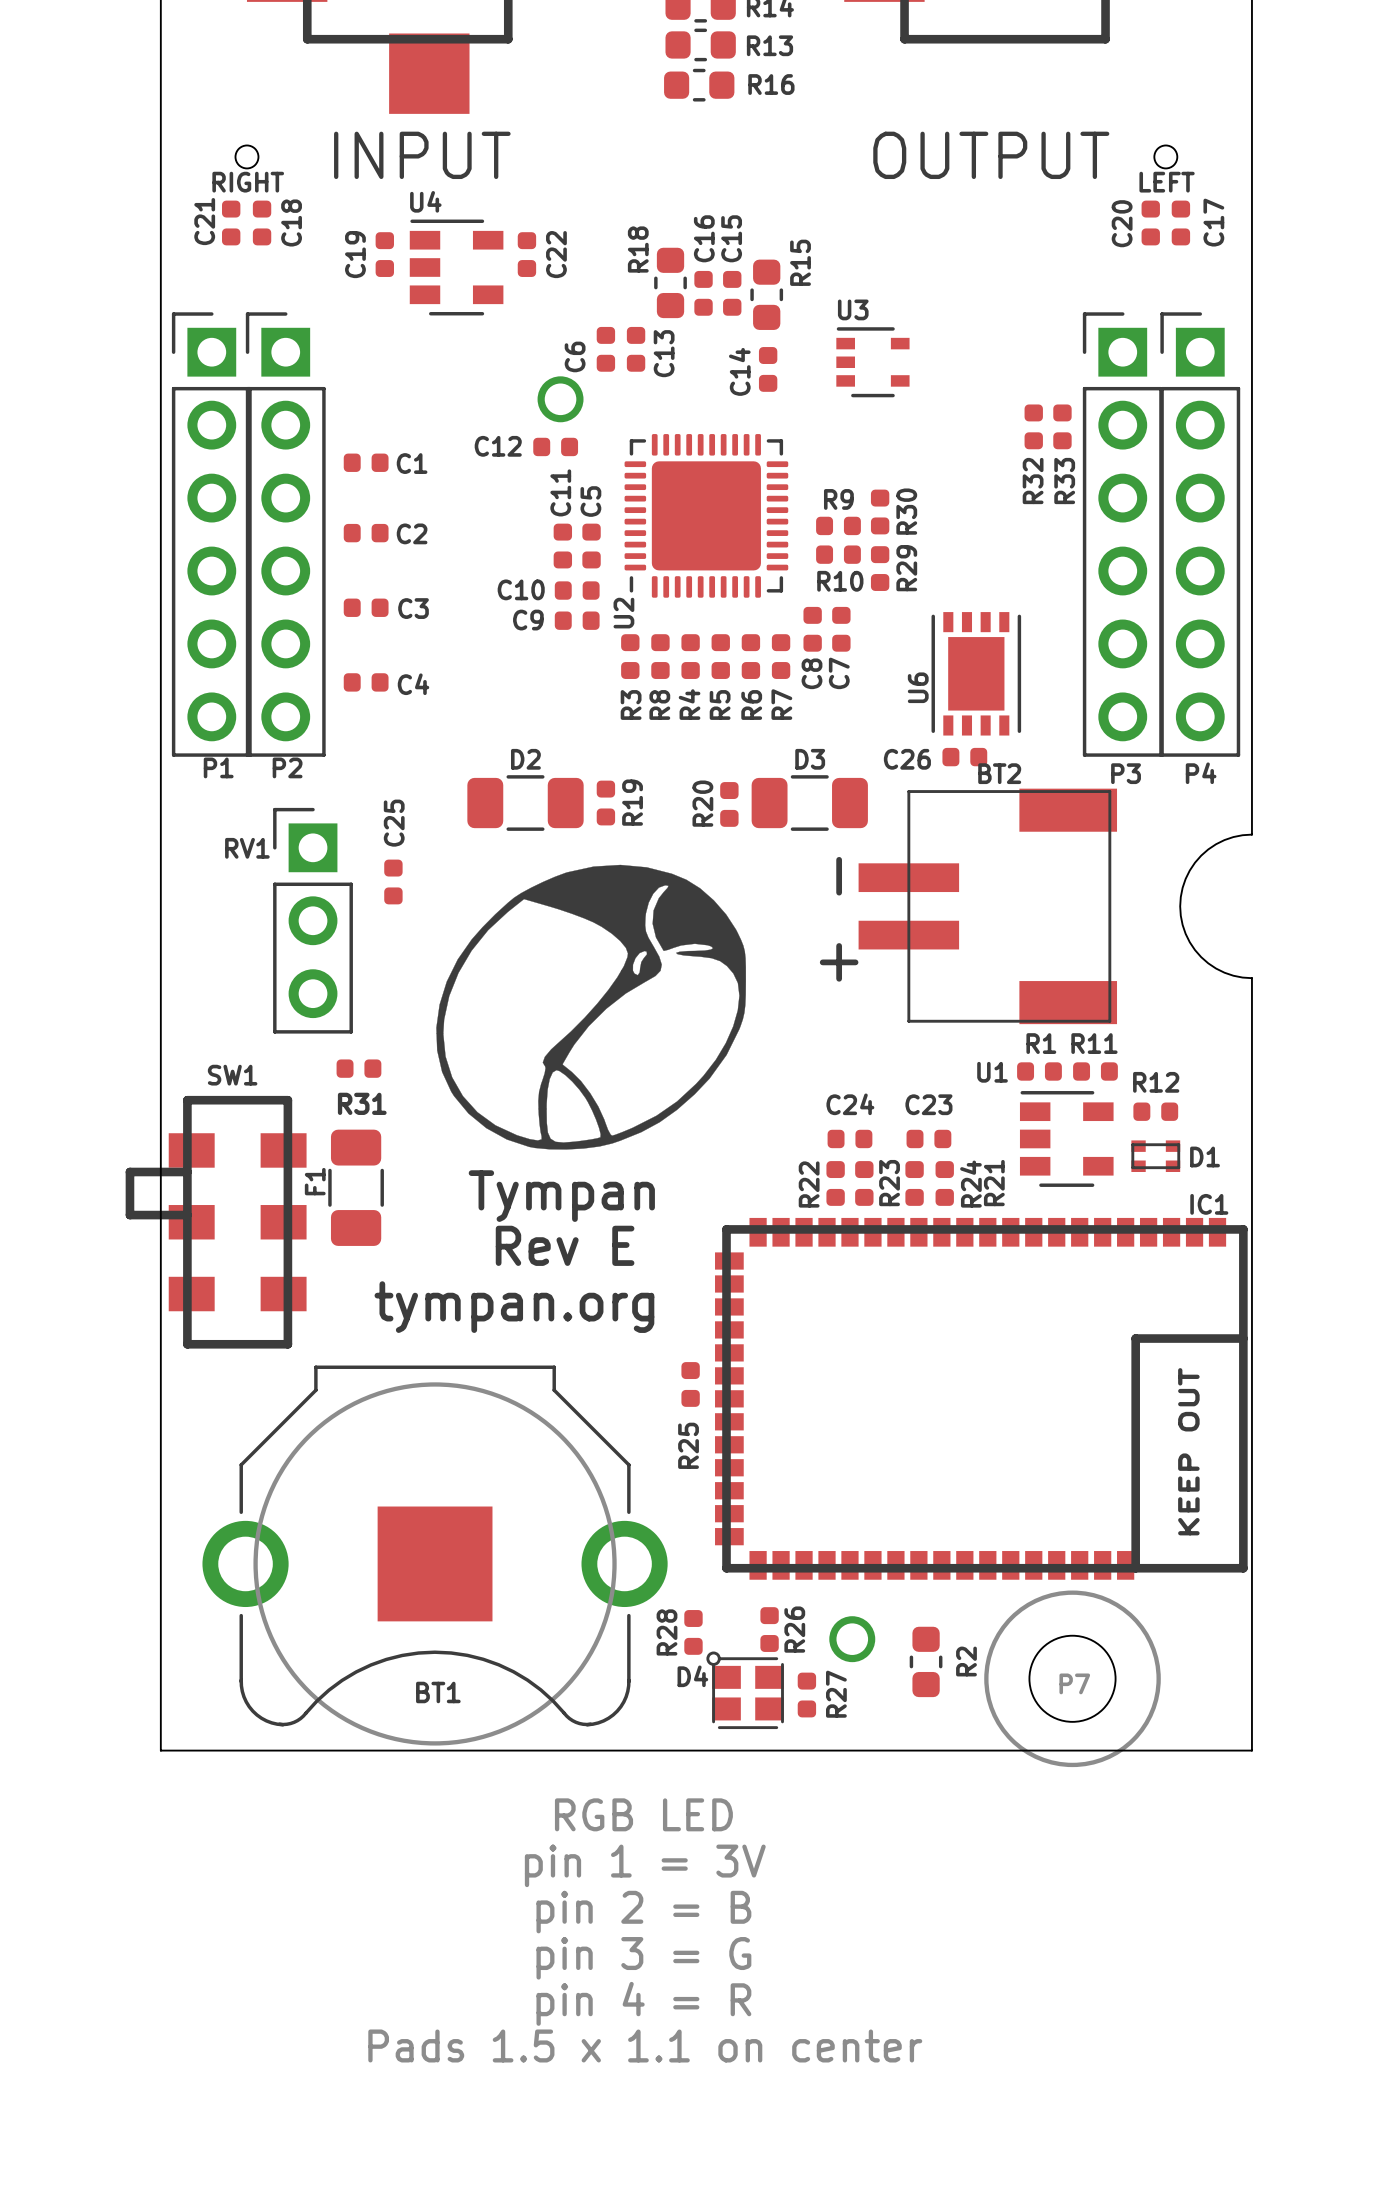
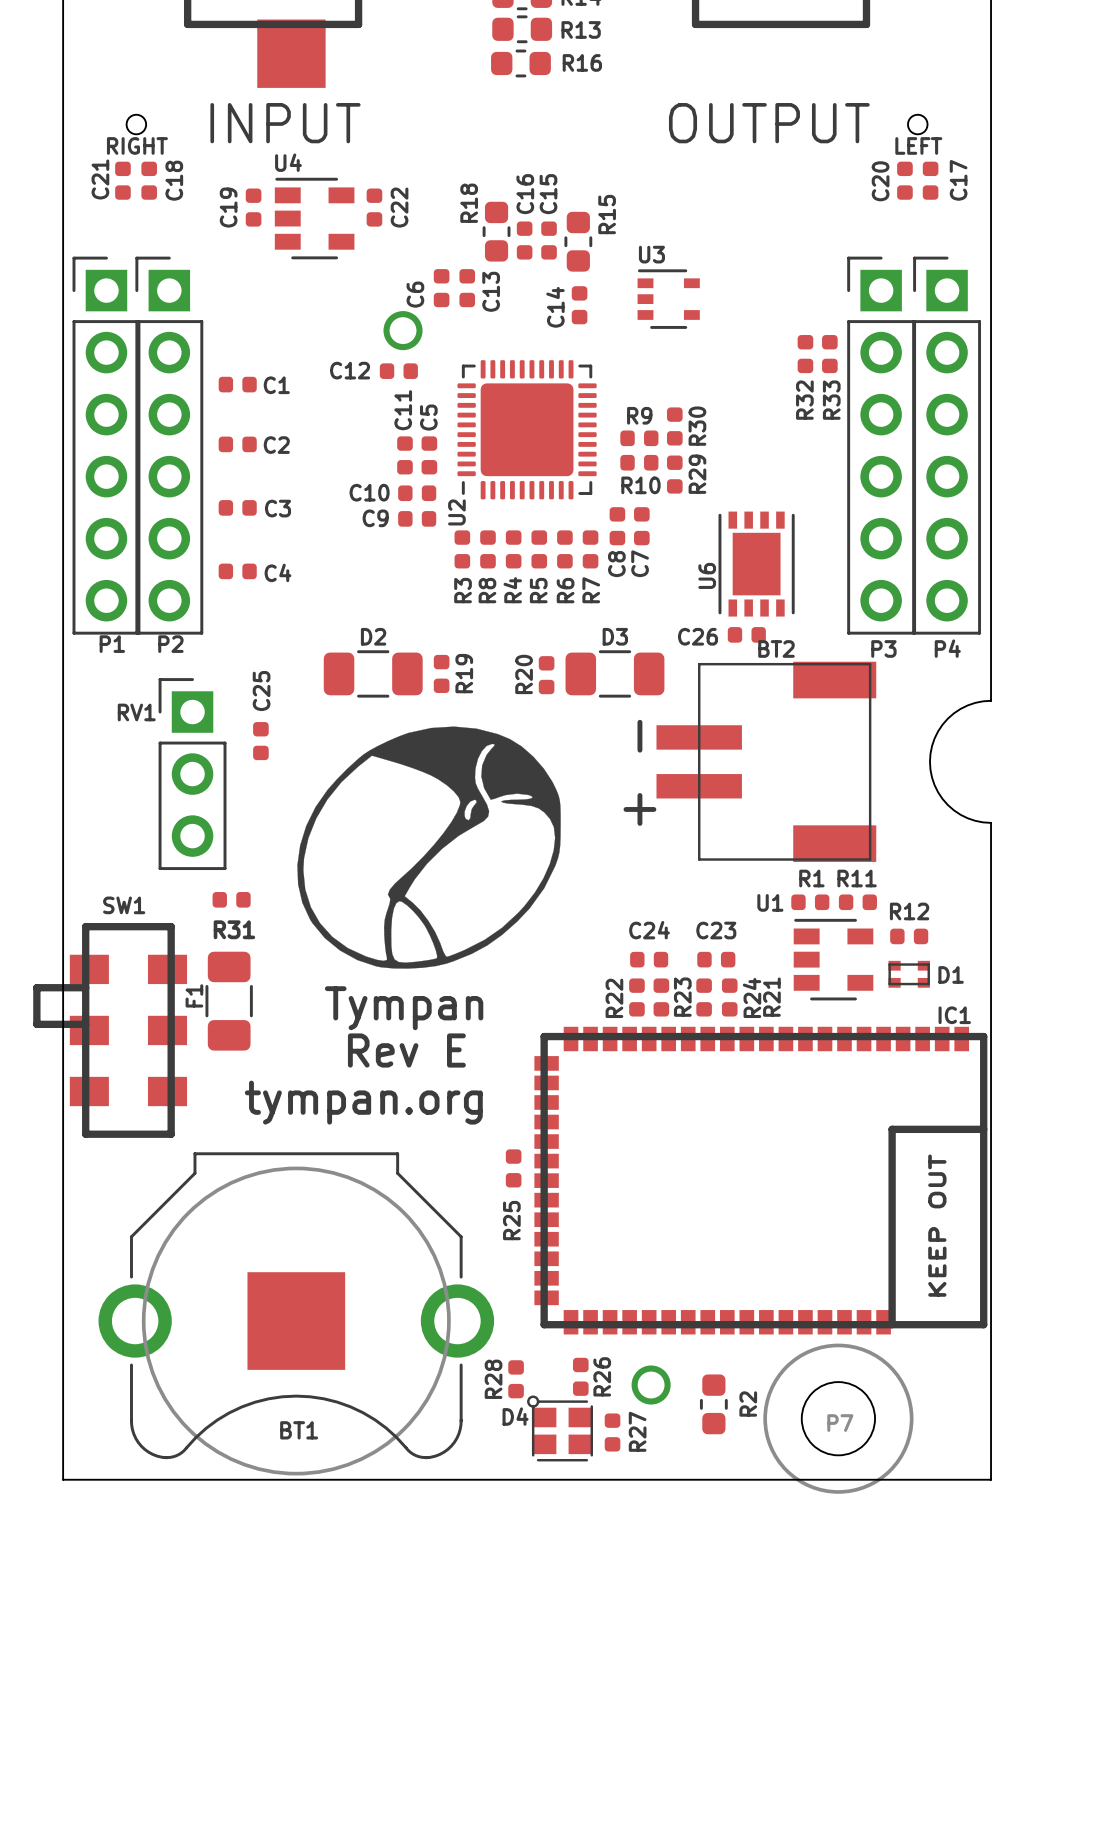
text: RGB LED (643, 1814) -> none
text: pin 1 = 3V (645, 1865) -> none
text: pin 2 = B (643, 1912) -> none
text: pin 3 = G (643, 1958) -> none
text: pin 4 = R (643, 2003) -> none
text: Pads 1.5 x 1.1 on center (645, 2045) -> none

